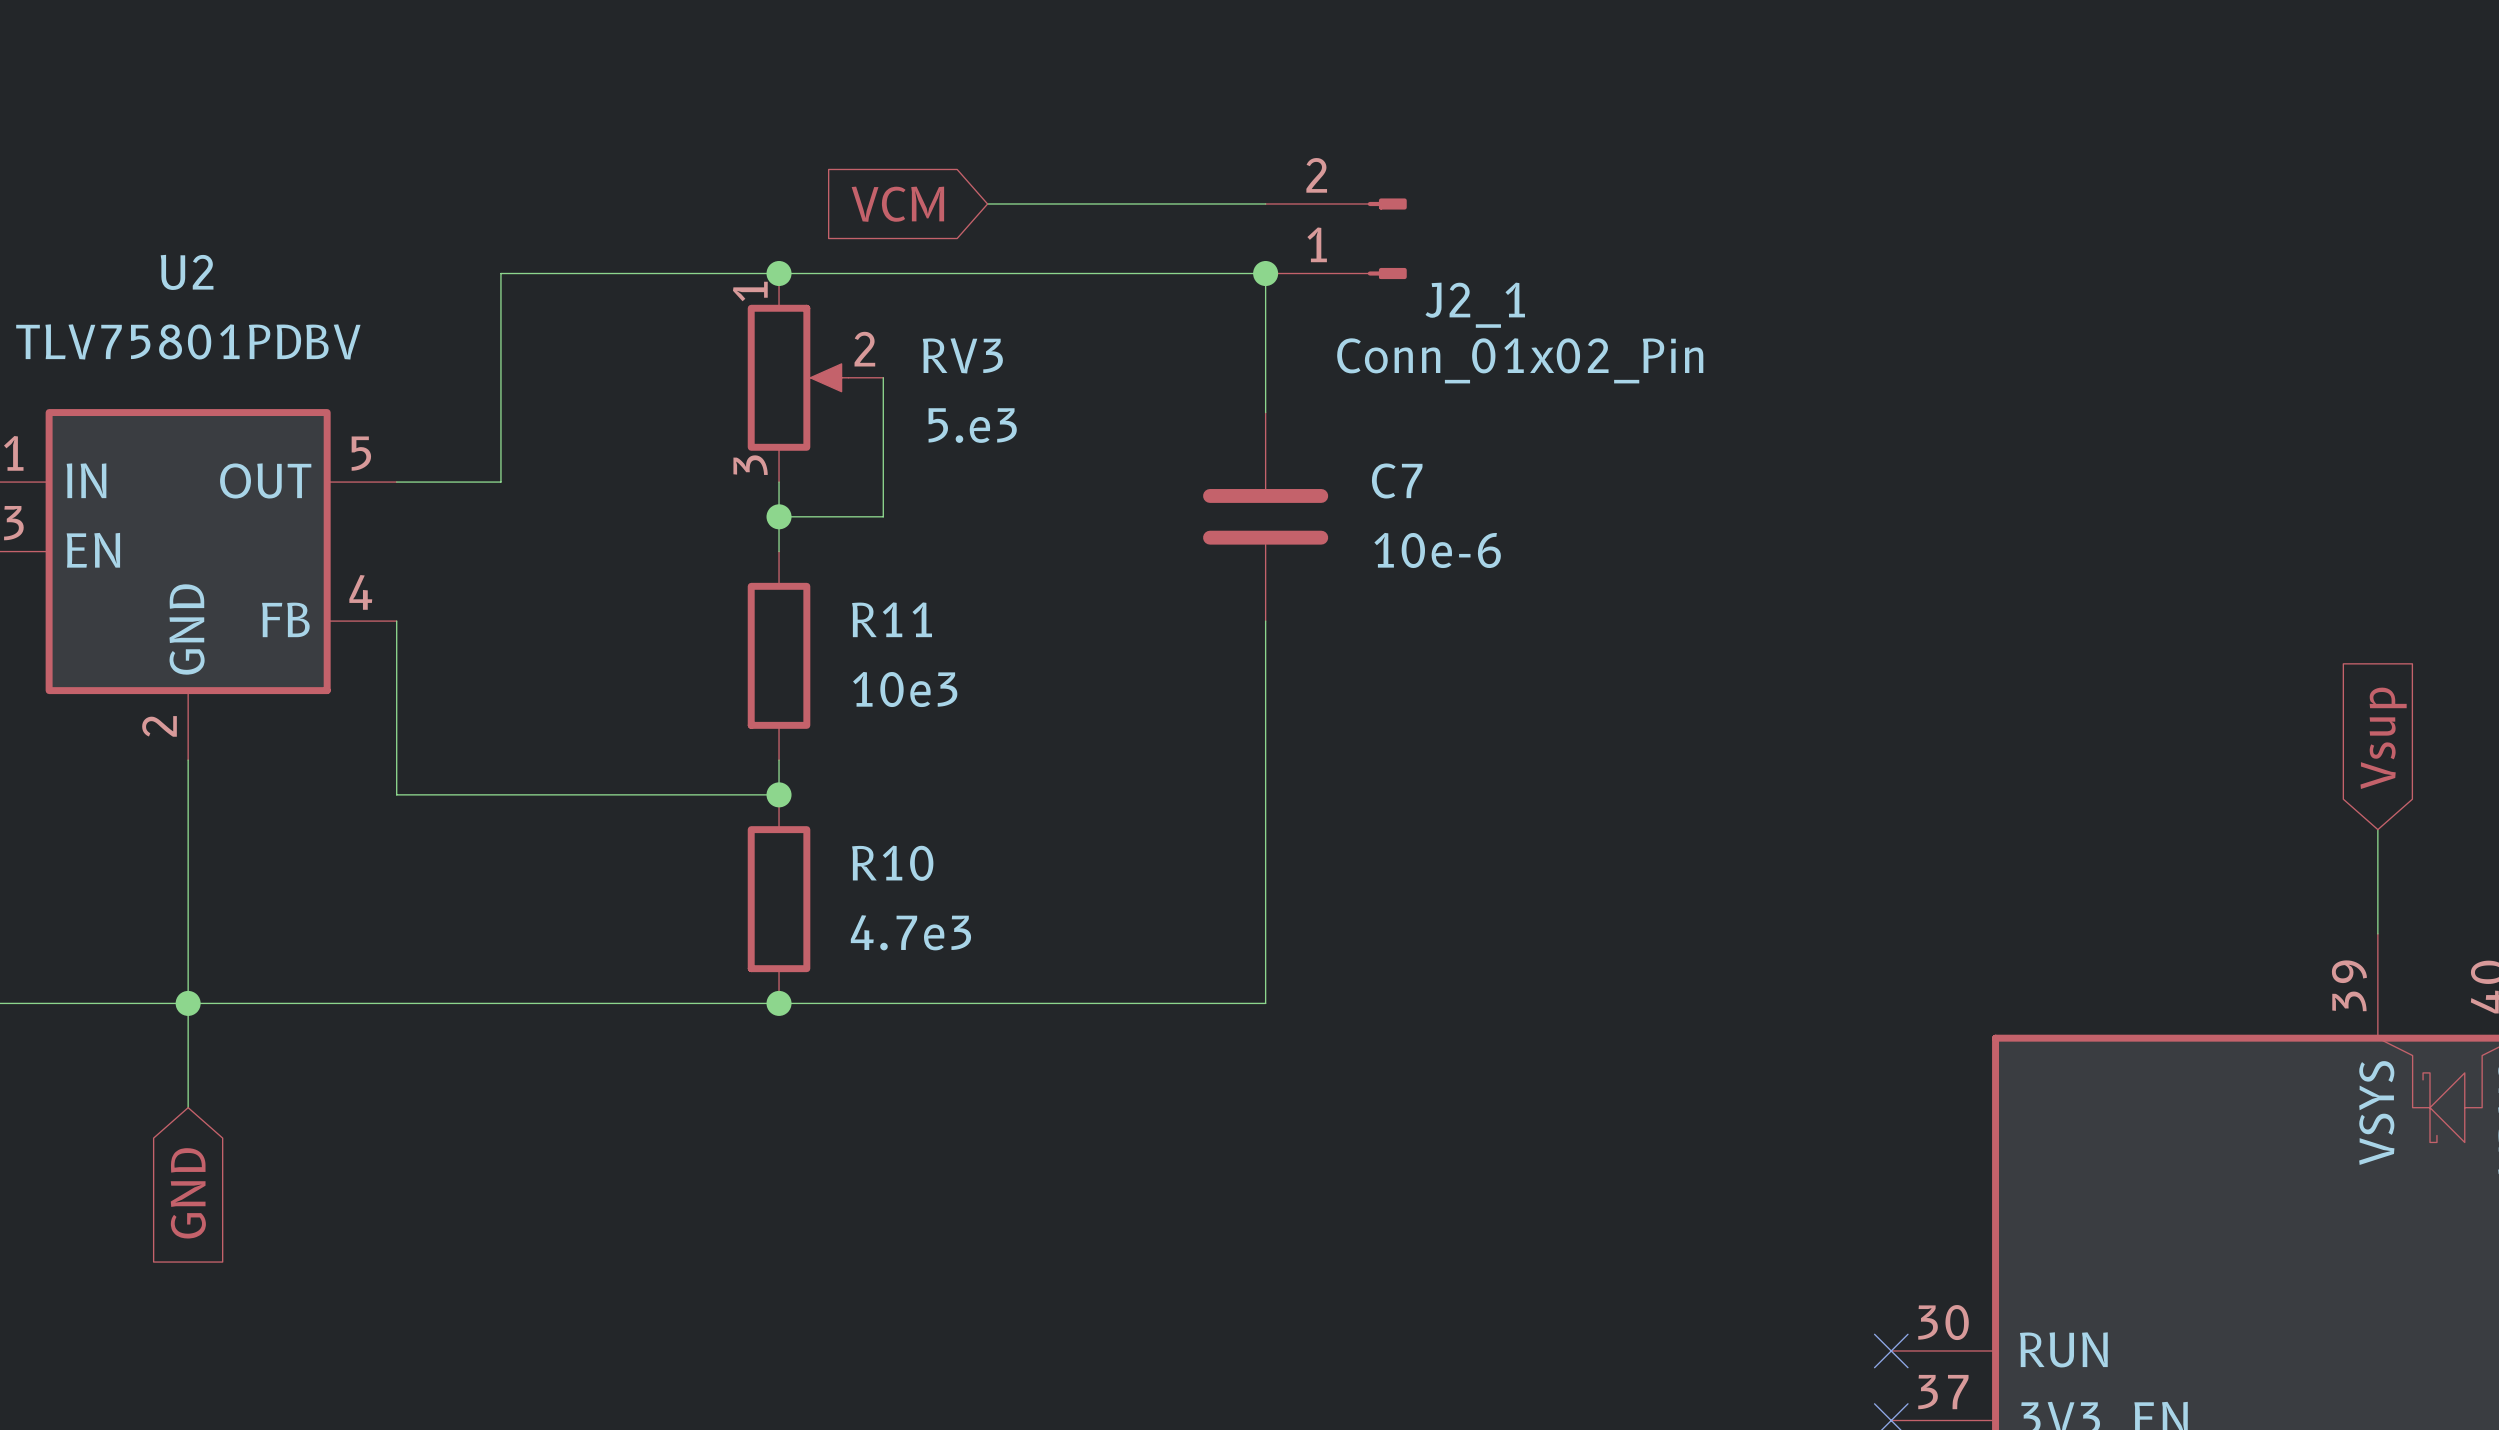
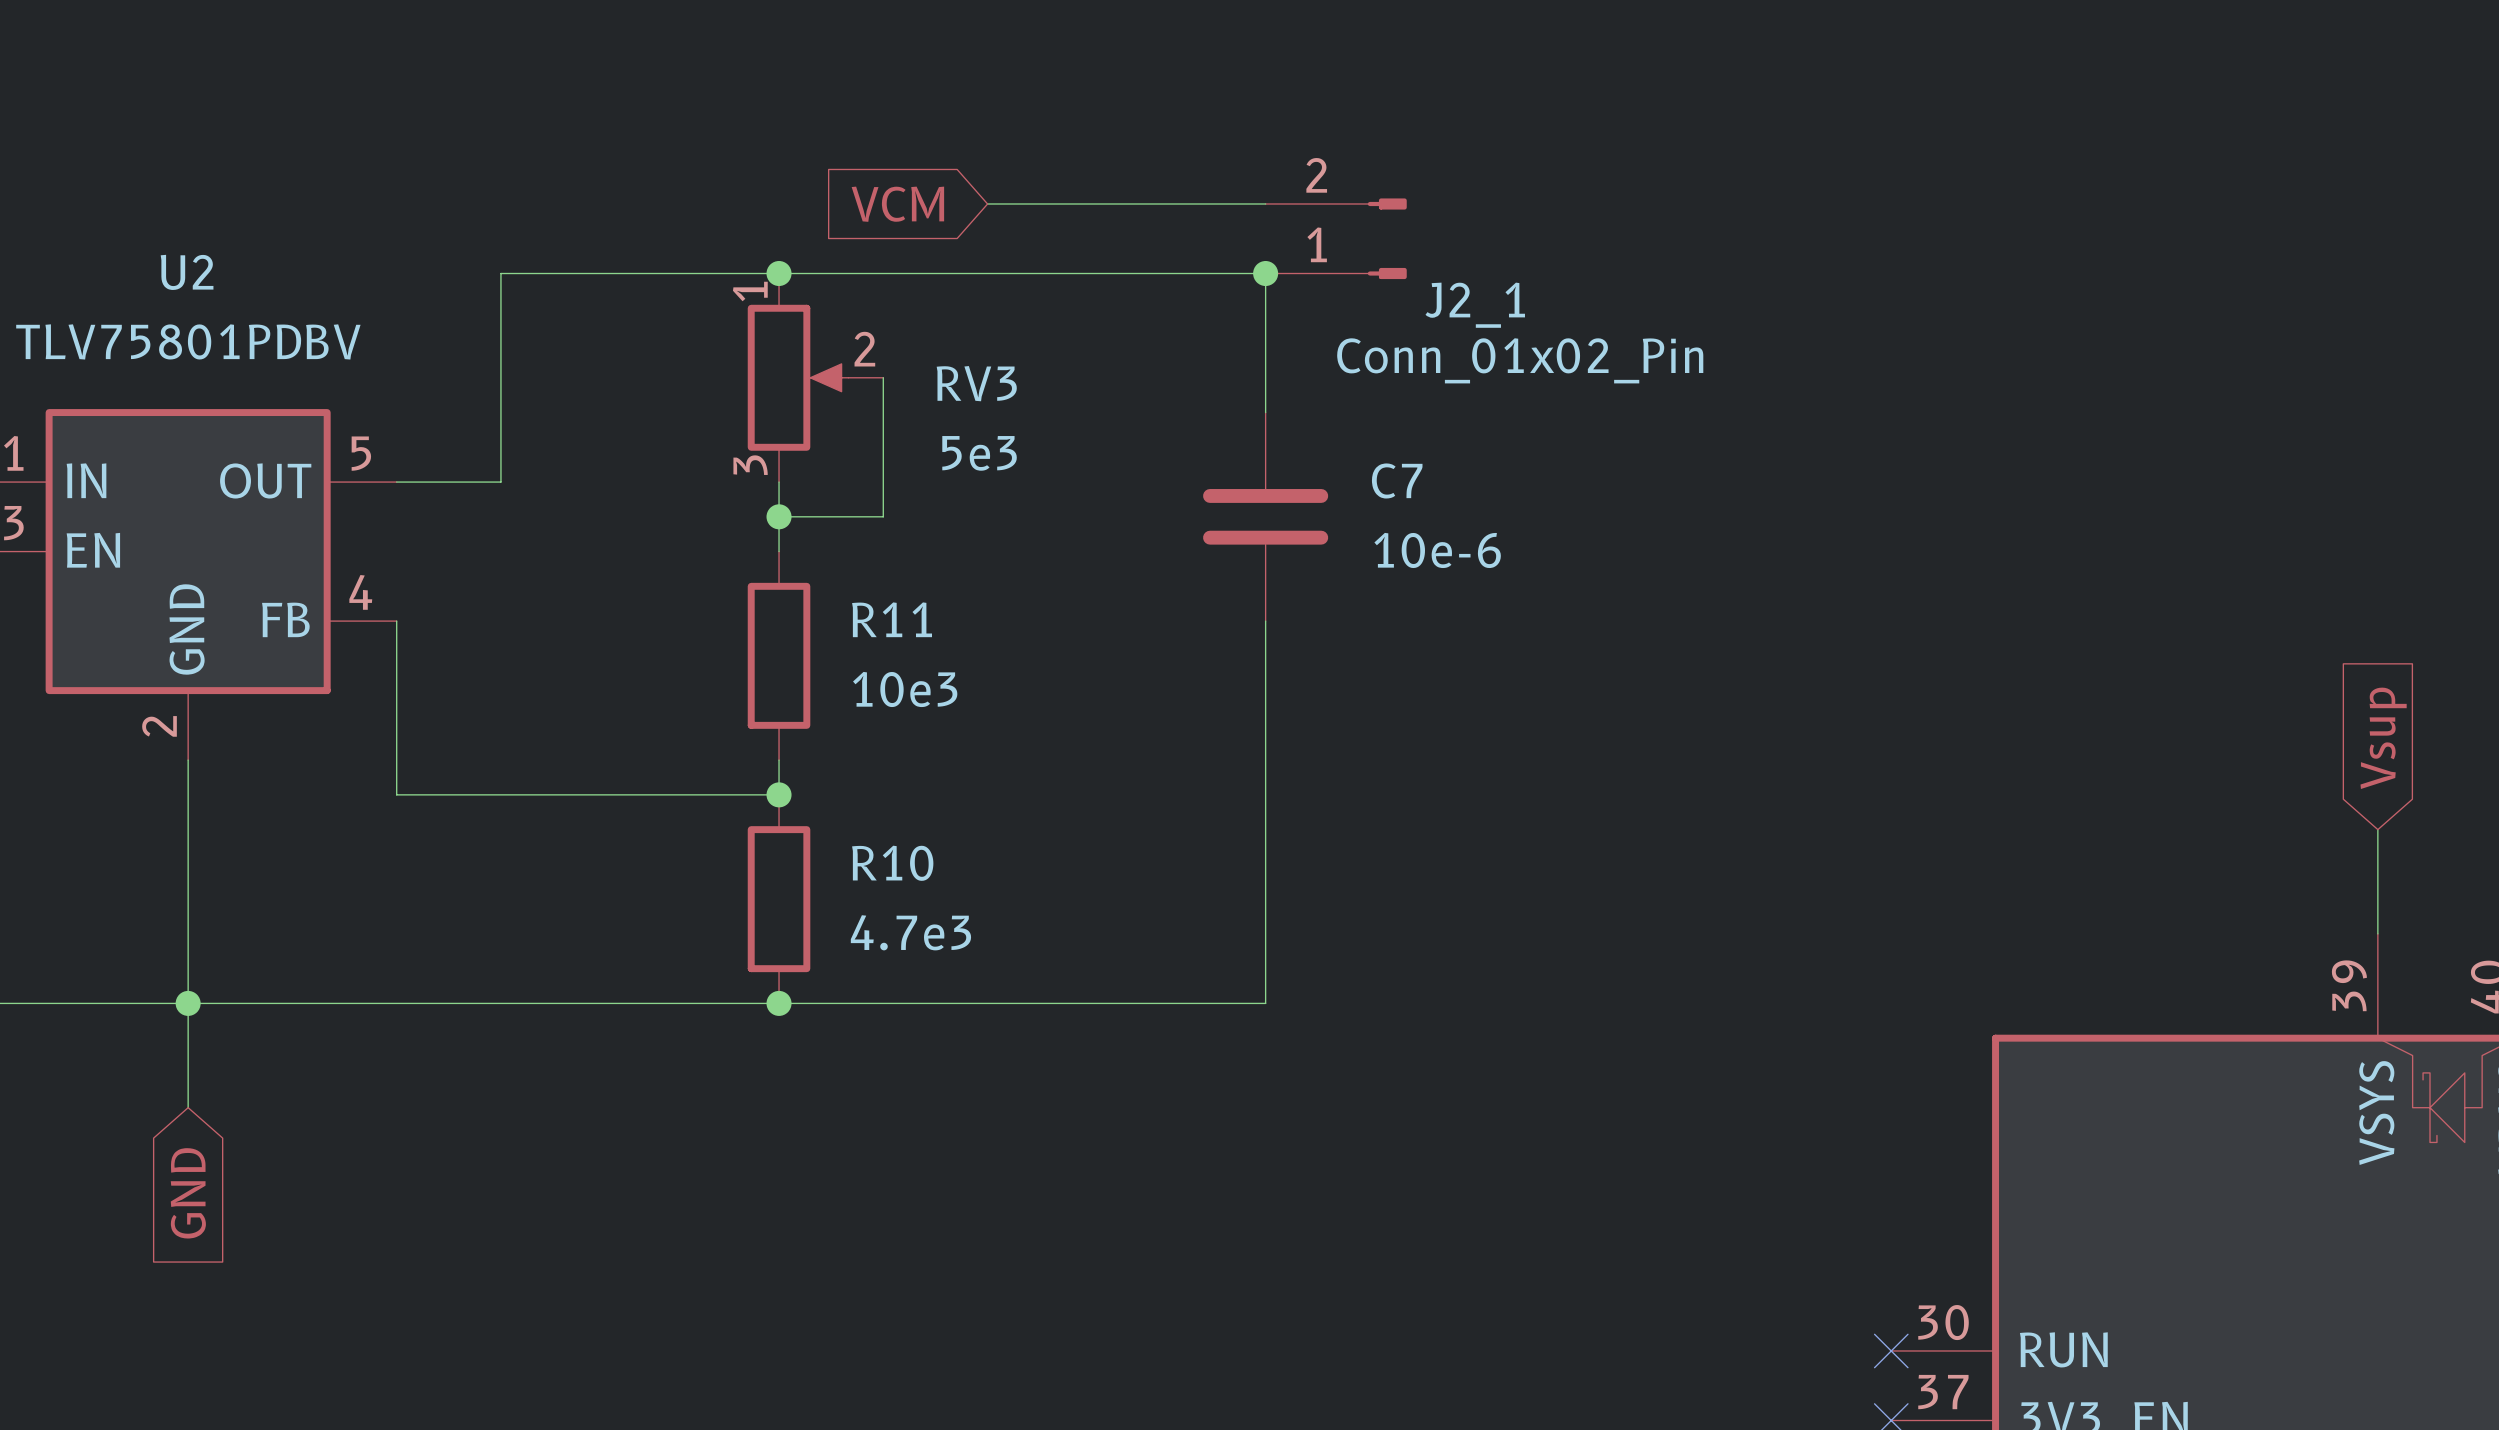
RV3 name position: RV3 (962, 355) -> RV3 (976, 383)
RV3 value: 5.e3 (972, 425) -> 5e3 (979, 453)

